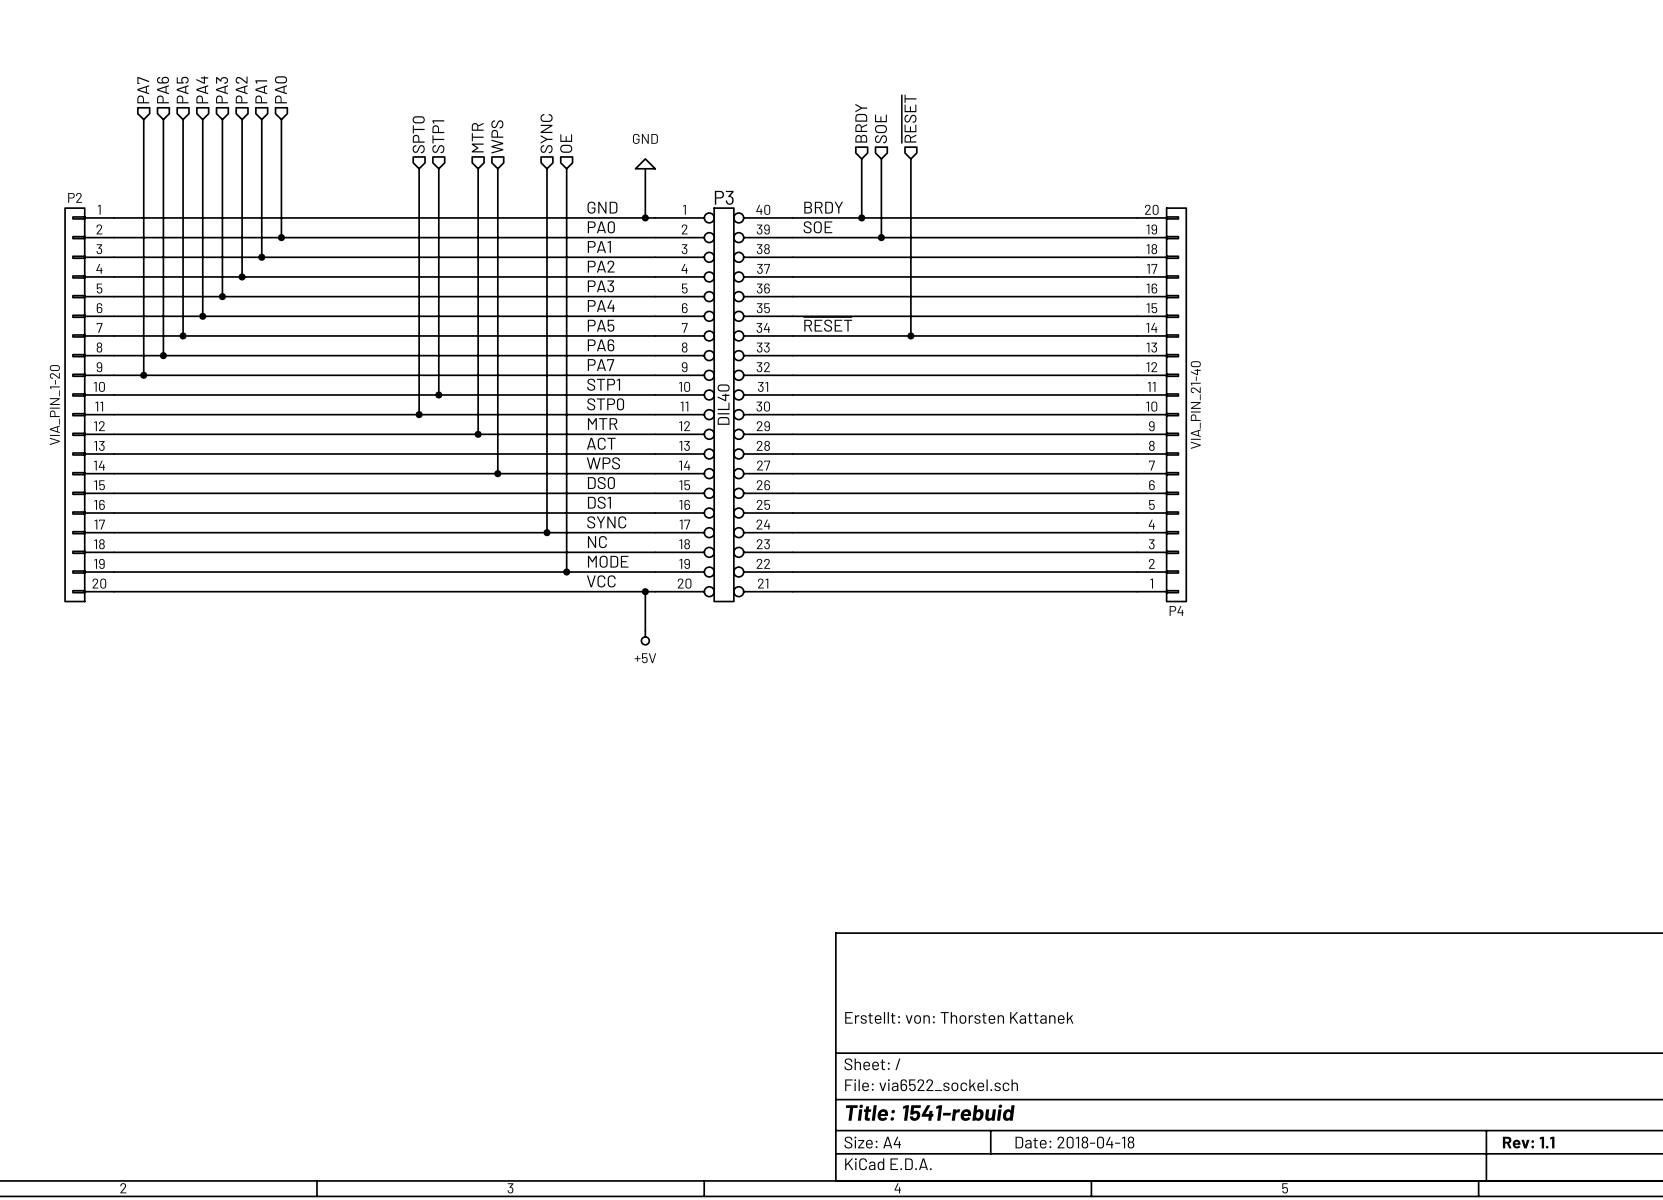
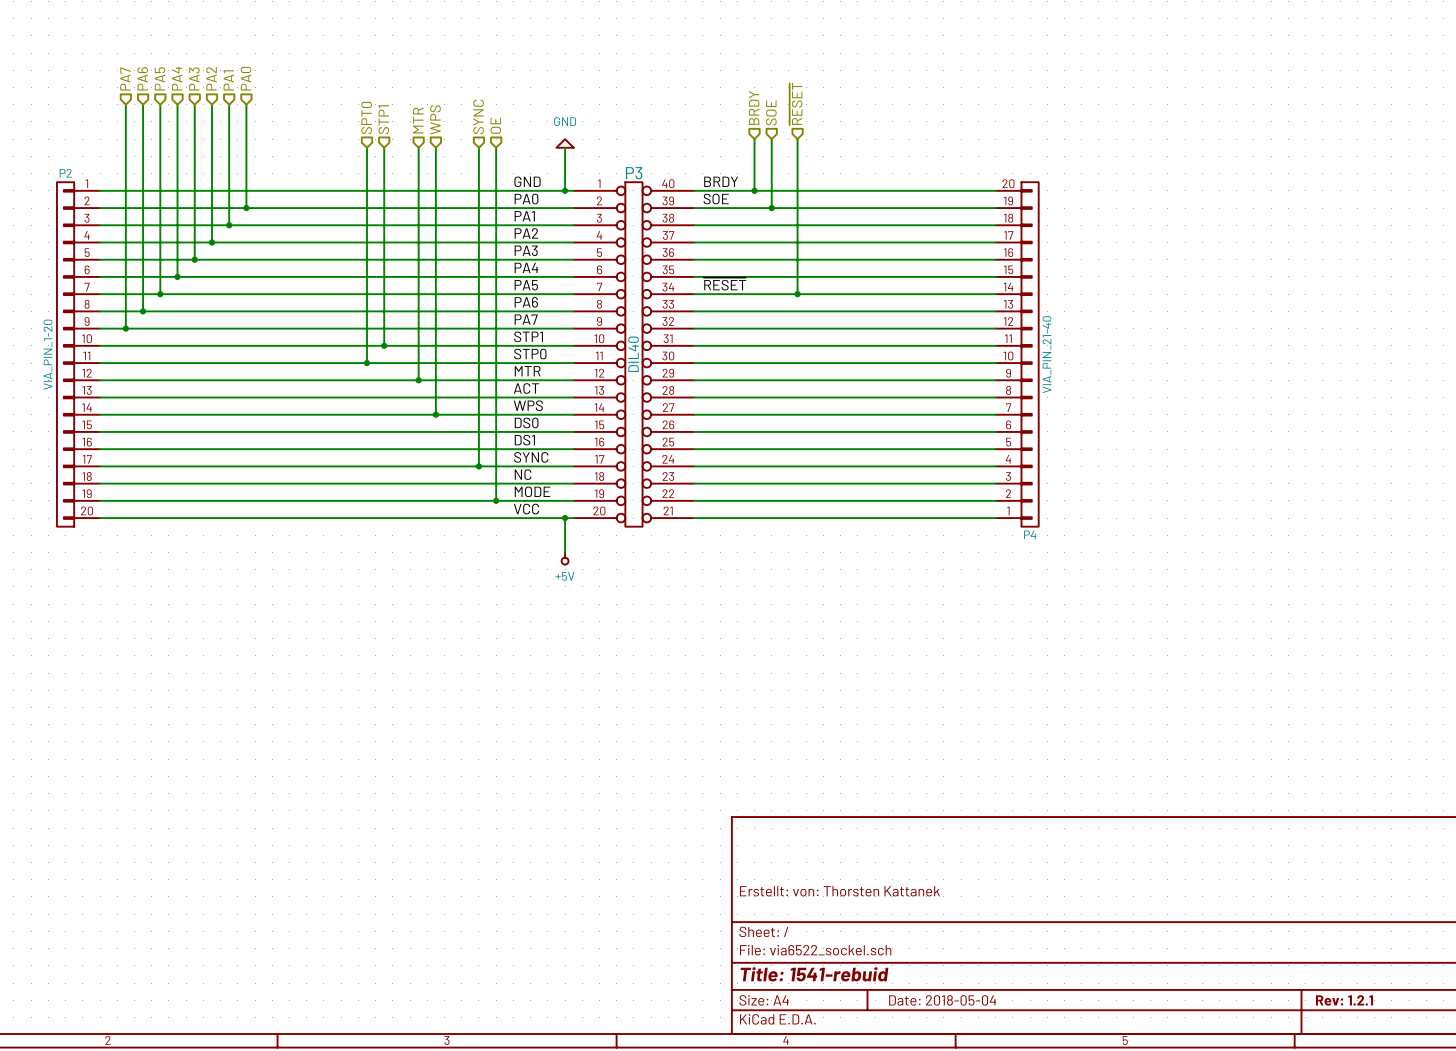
title block: Date: 2018-04-18 (1074, 1142) -> Date: 2018-05-04 (942, 1000)
title block: Rev: 1.1 (1528, 1142) -> Rev: 1.2.1 (1344, 1000)

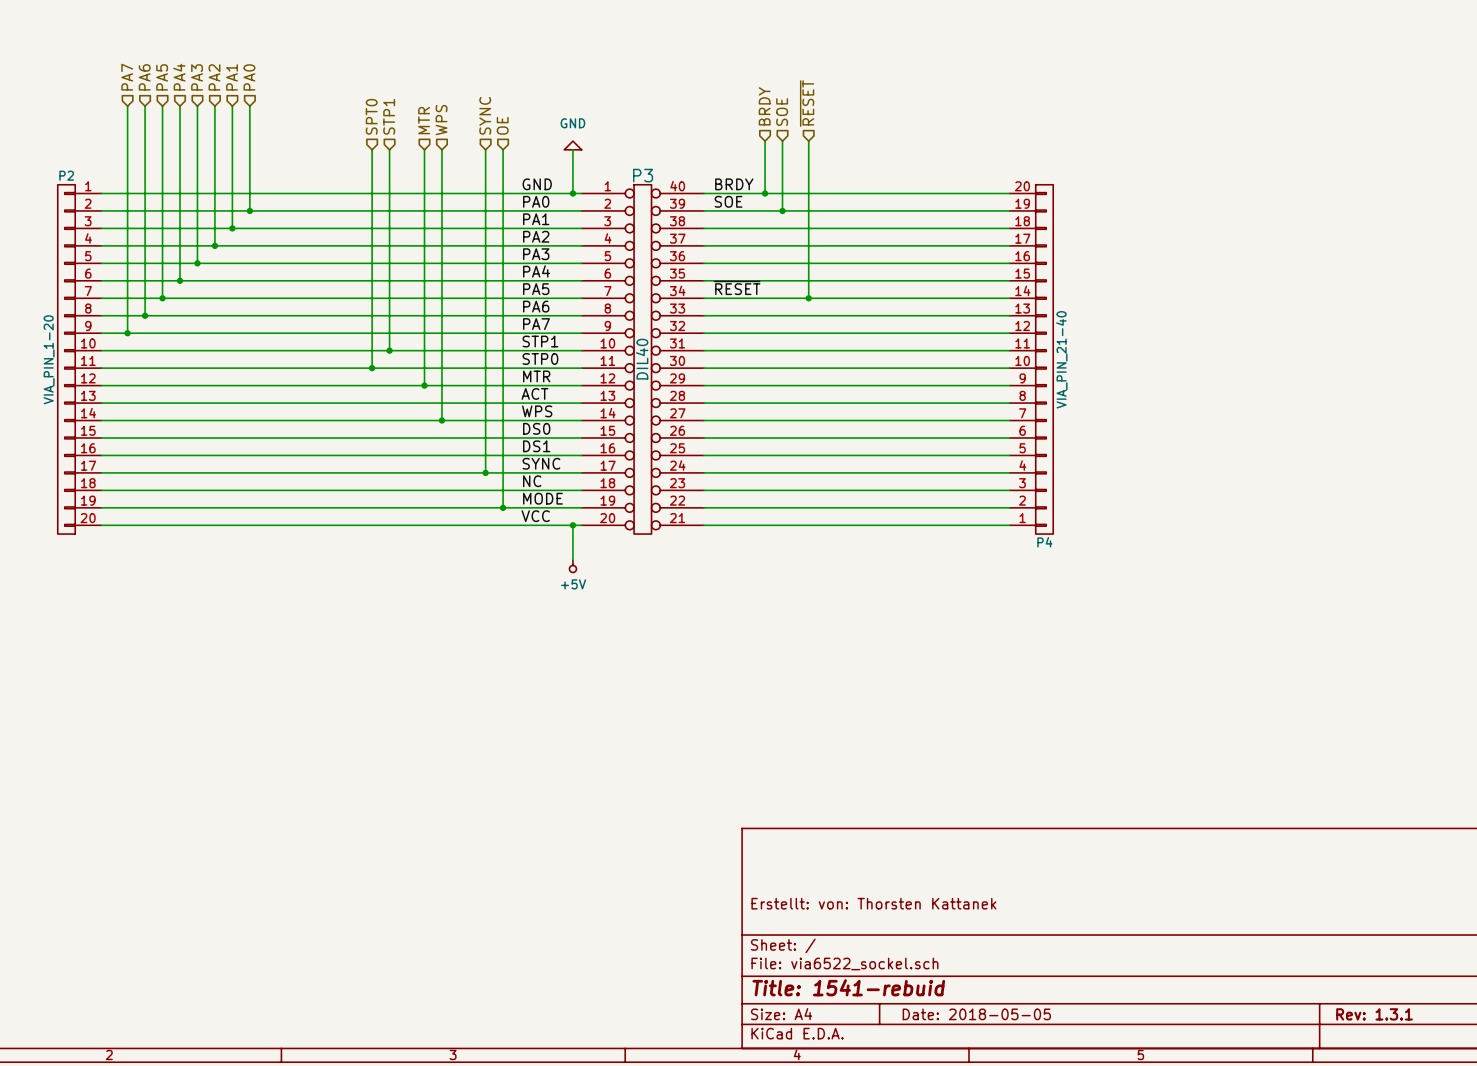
title block: Date: 2018-05-04 (942, 1000) -> Date: 2018-05-05 (976, 1014)
title block: Rev: 1.2.1 (1344, 1000) -> Rev: 1.3.1 (1374, 1014)

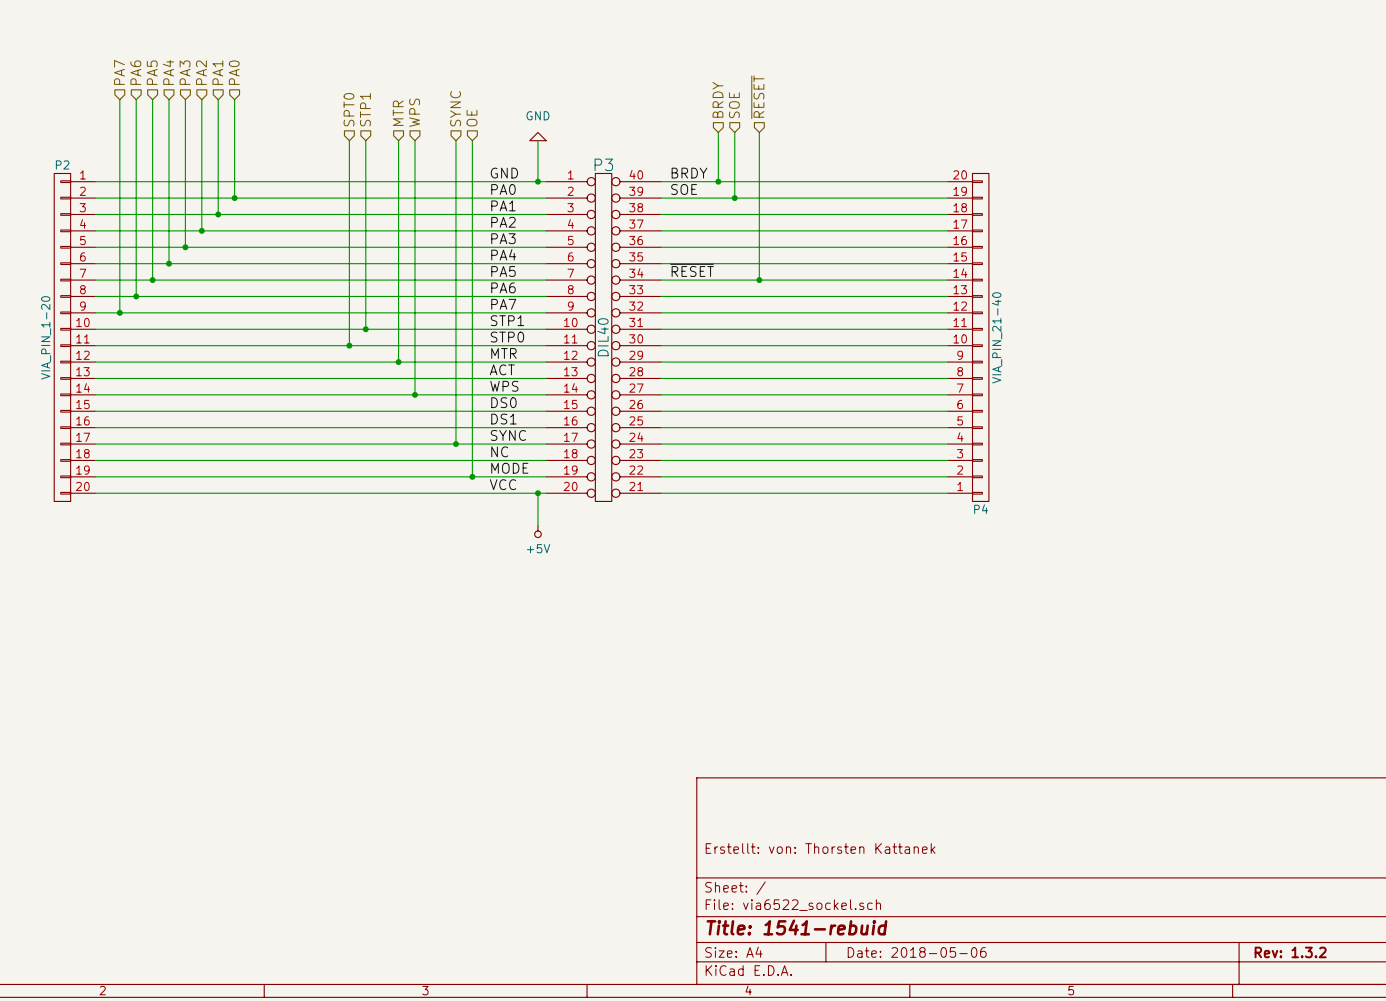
title block: Date: 2018-05-05 (976, 1014) -> Date: 2018-05-06 (917, 952)
title block: Rev: 1.3.1 (1374, 1014) -> Rev: 1.3.2 (1290, 952)

